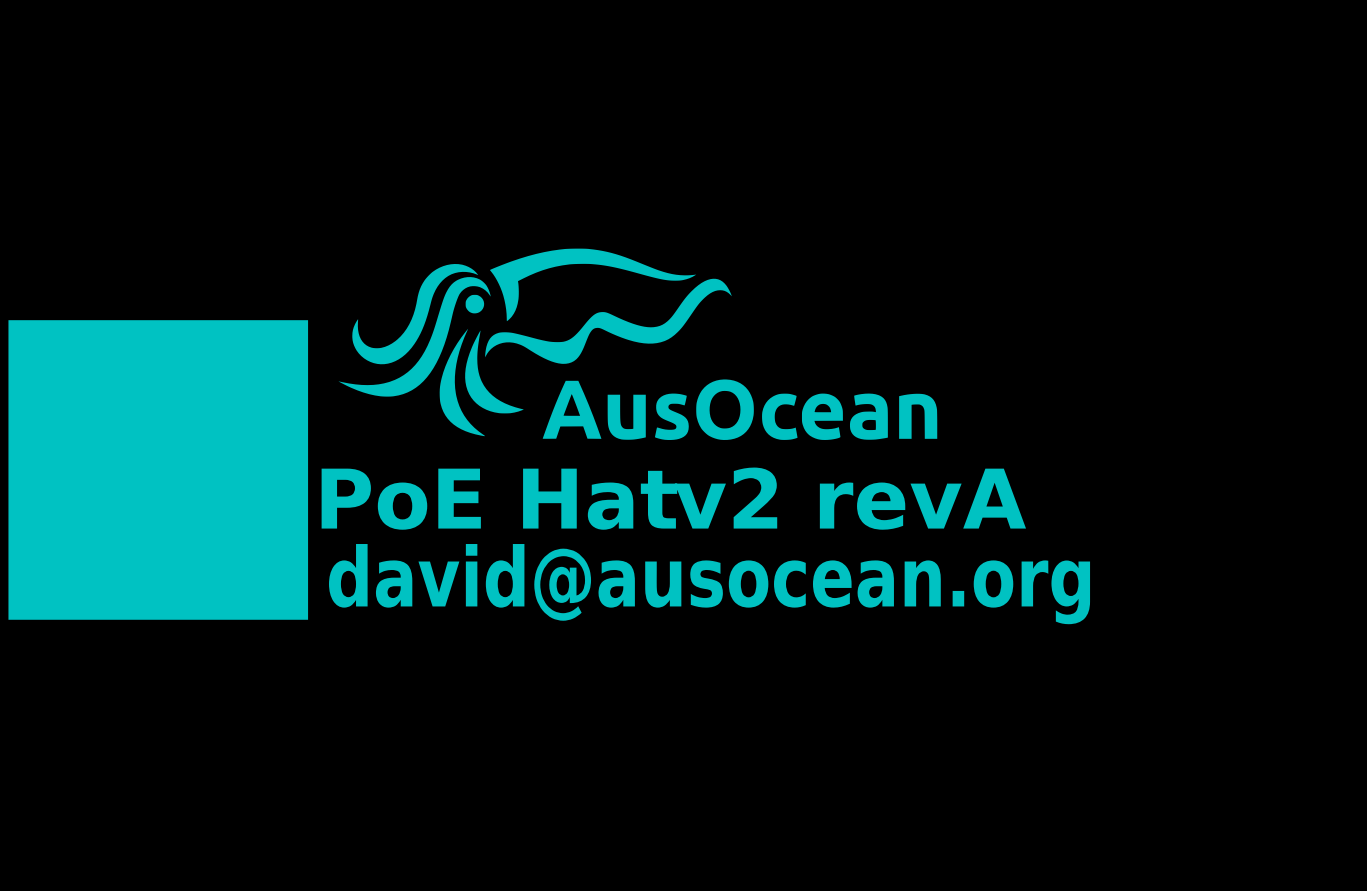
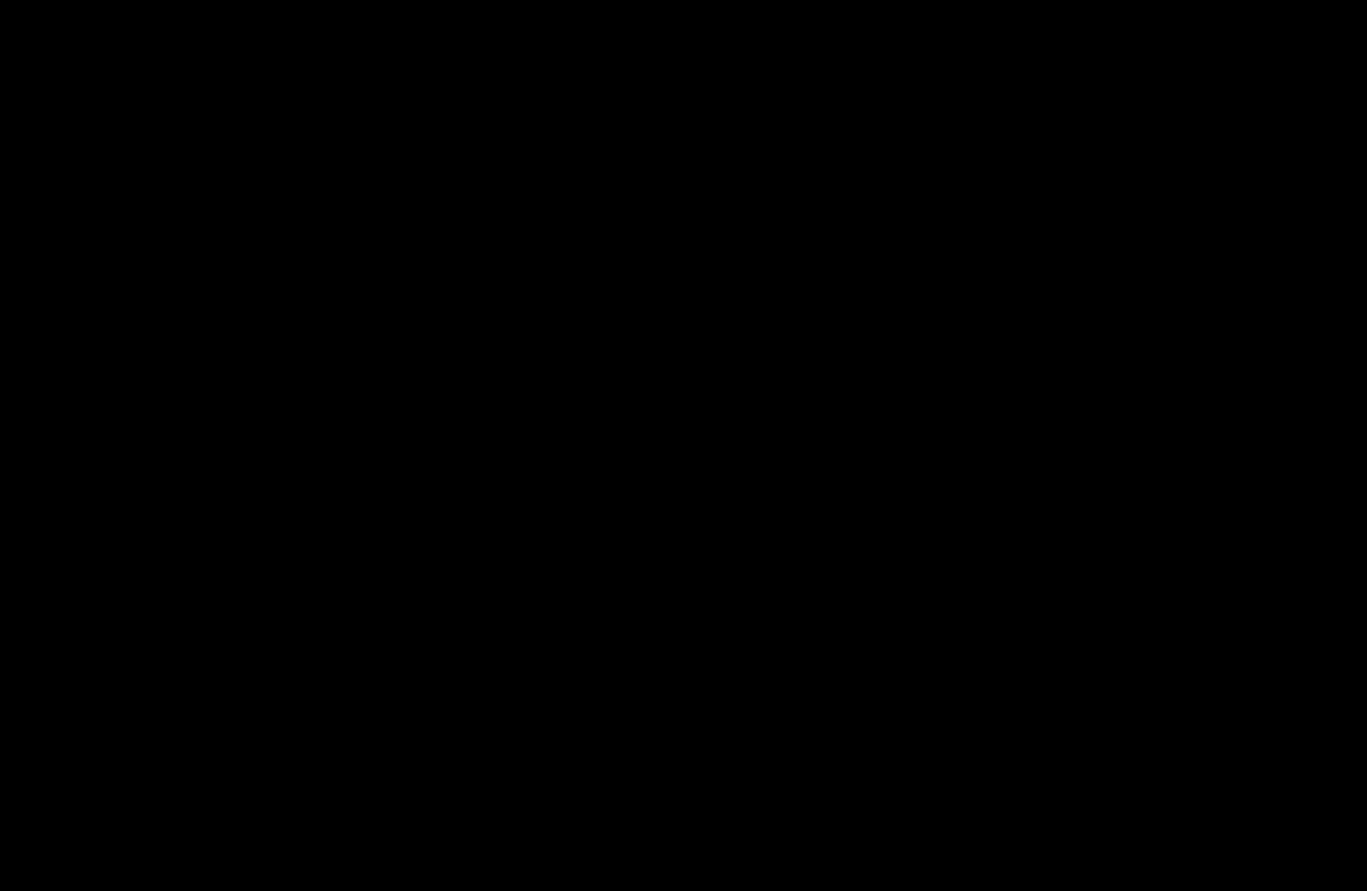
drawing: [8, 248, 938, 620] -> none
text: v2 revA (850, 498) -> none
text: PoE Hat (499, 499) -> none
text: david@ausocean.org (709, 584) -> none

